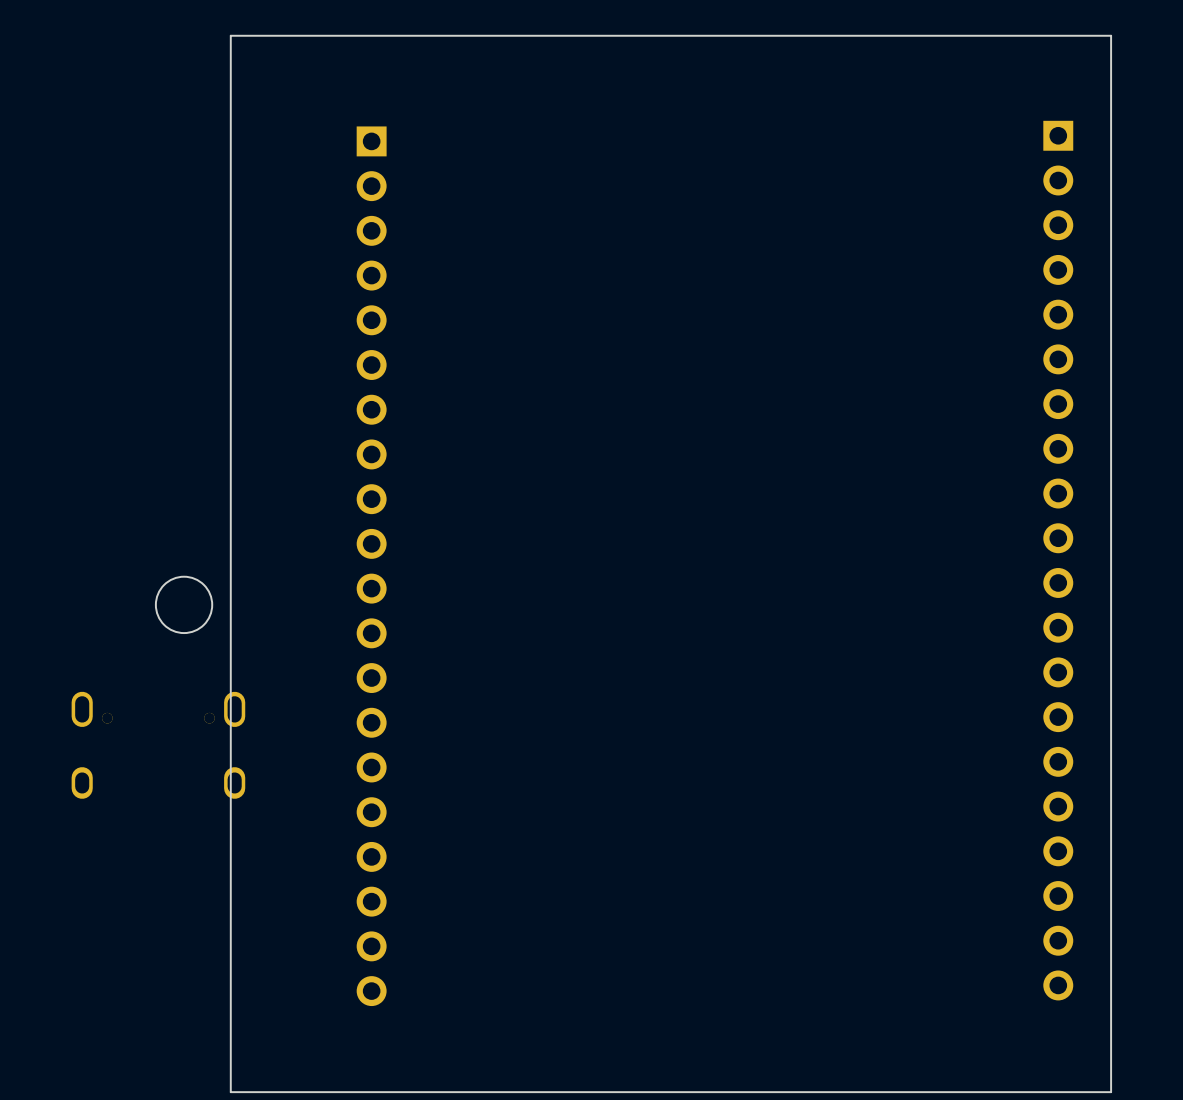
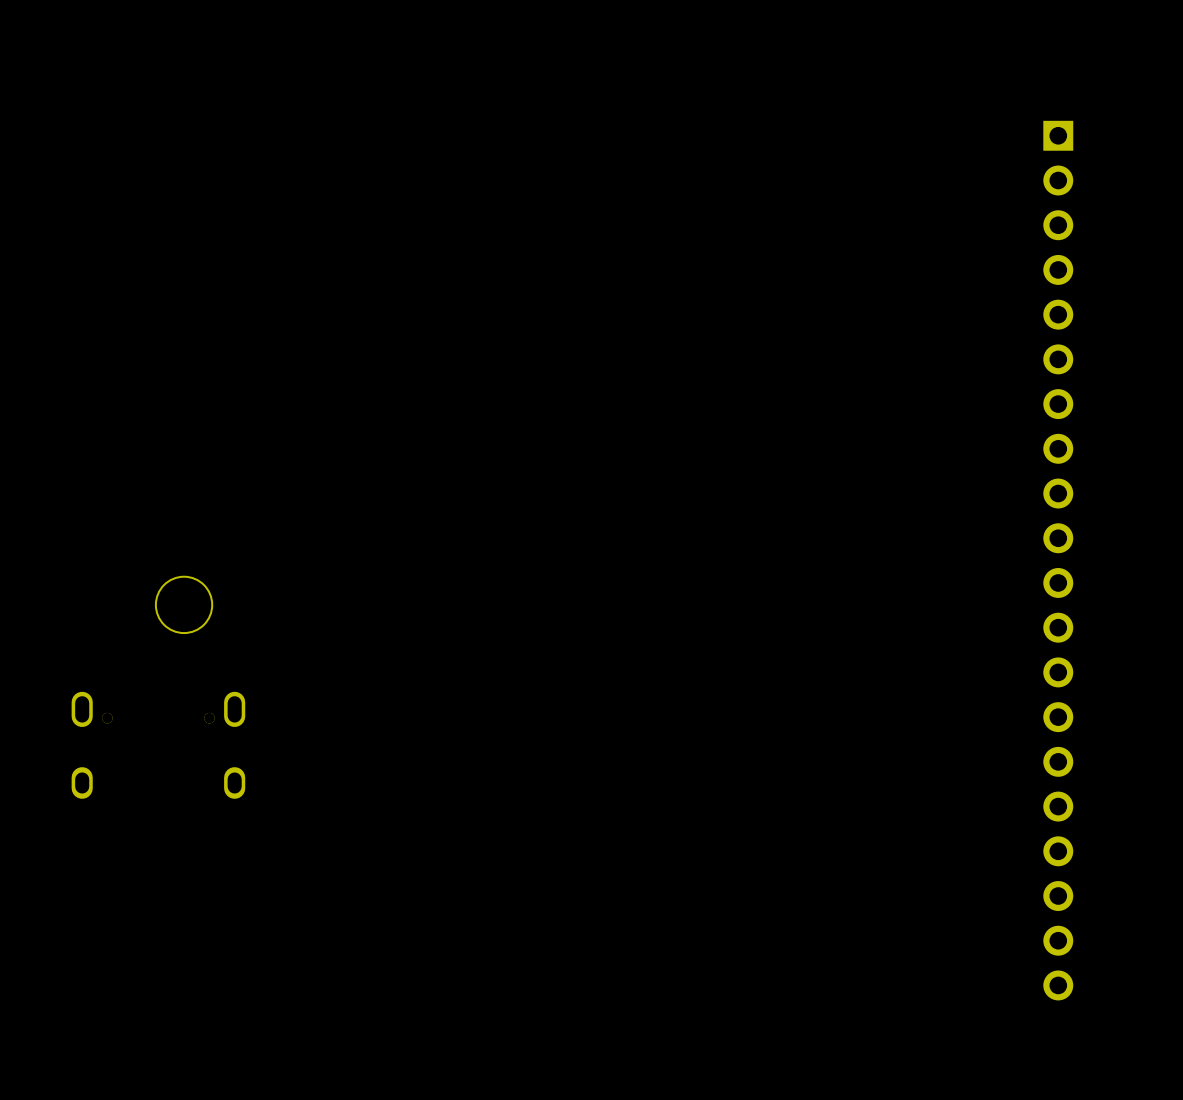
board edge: (1111, 35) (230, 35) (230, 1092) (1111, 1092) (1111, 35) -> none
part: (371, 566) -> none

